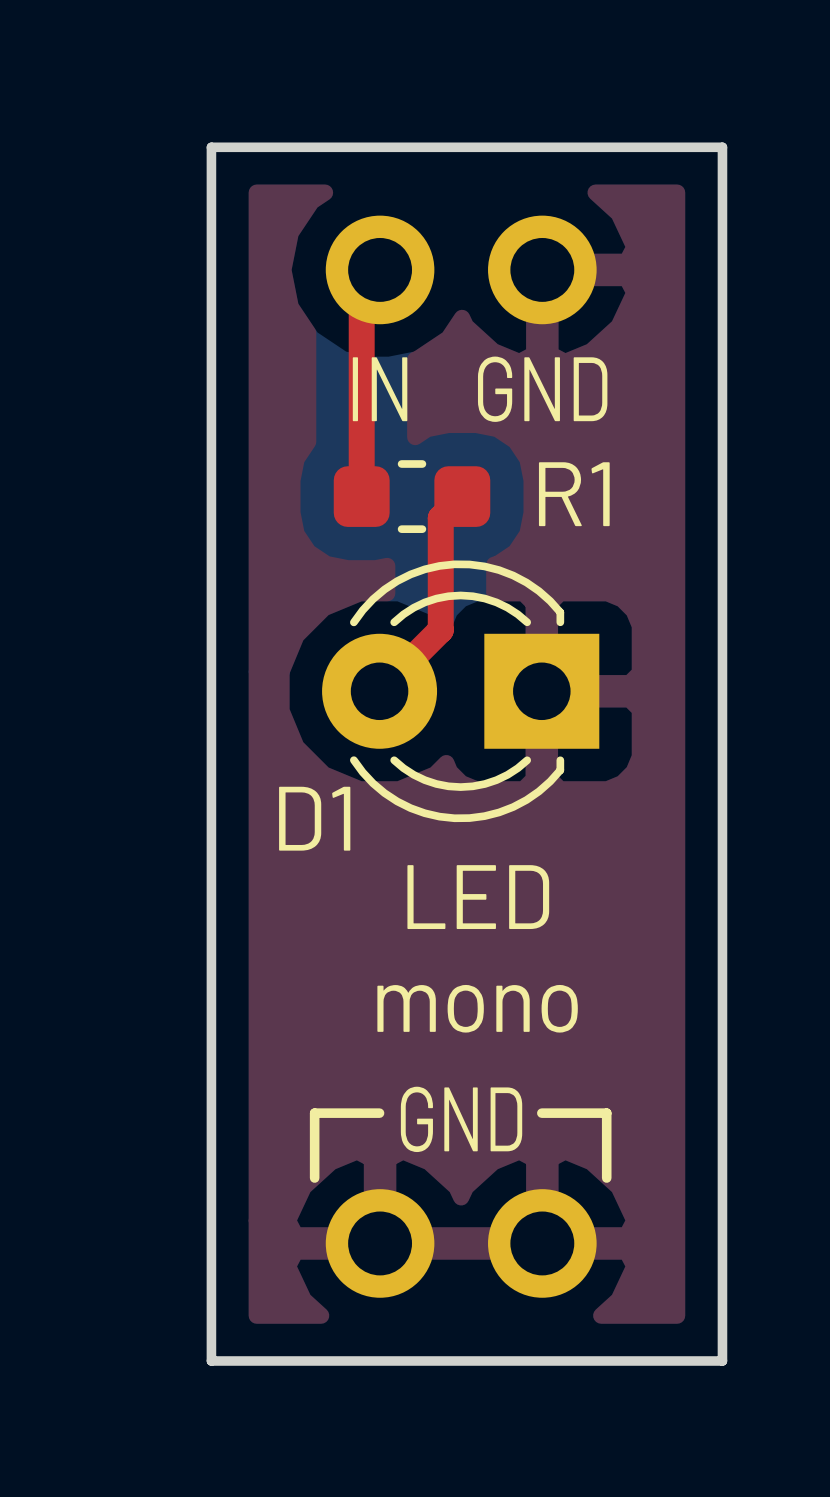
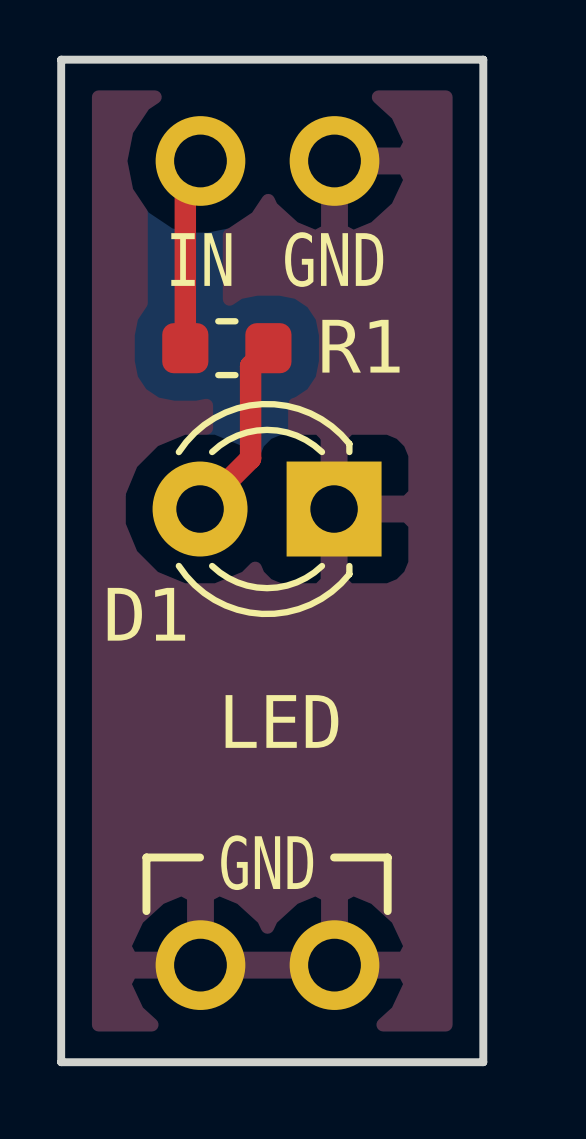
text position: LED (478, 897) -> LED (281, 721)
text: mono (477, 1008) -> none

